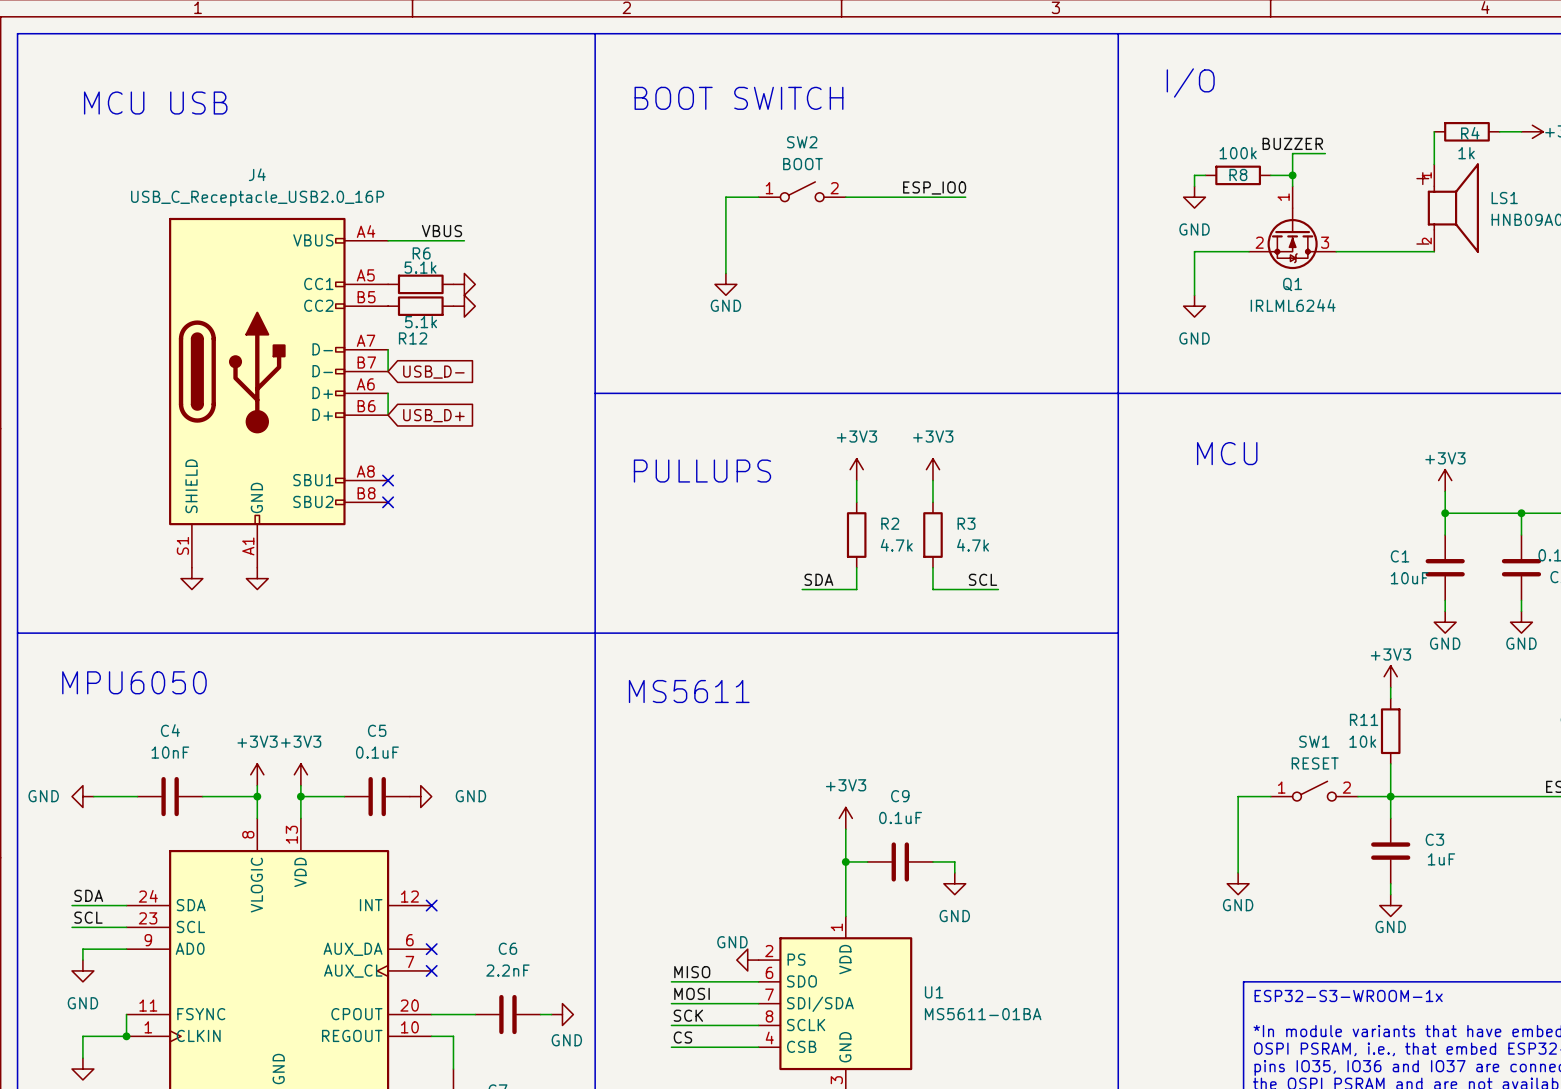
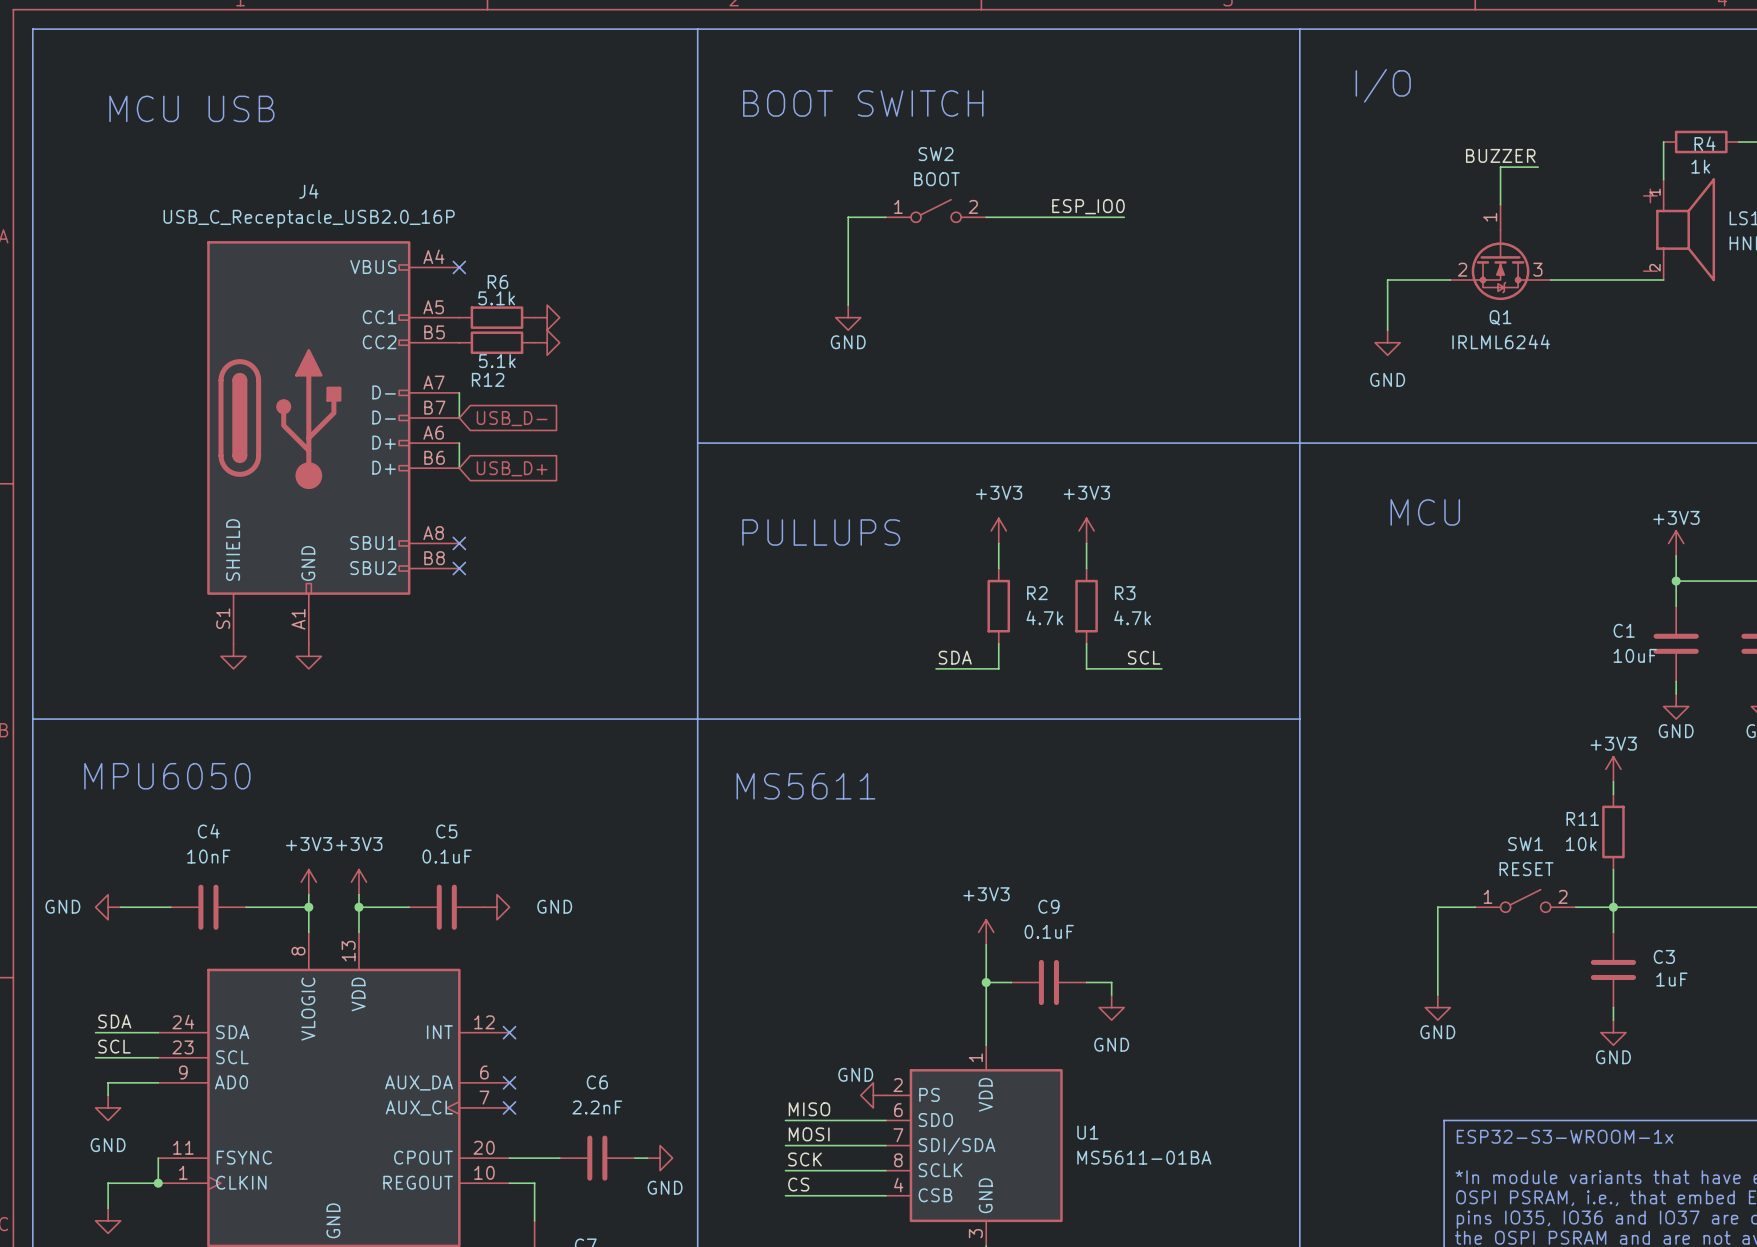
wire: (1205, 175) (1194, 175) (1194, 186) -> none
R8: 100k (1238, 175) -> none
wire: (1270, 175) (1292, 175) -> none
junction: (1292, 175) -> none
power symbol: GND (1194, 197) -> none
label: VBUS (441, 231) -> none
wire: (388, 240) (464, 240) -> none
no-connect mark: none -> (459, 267)

